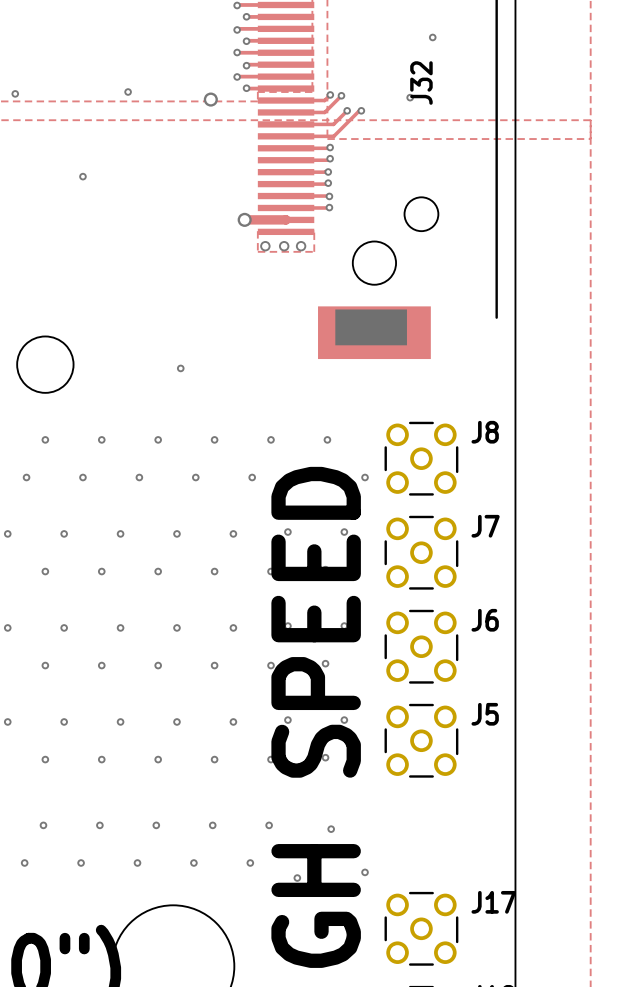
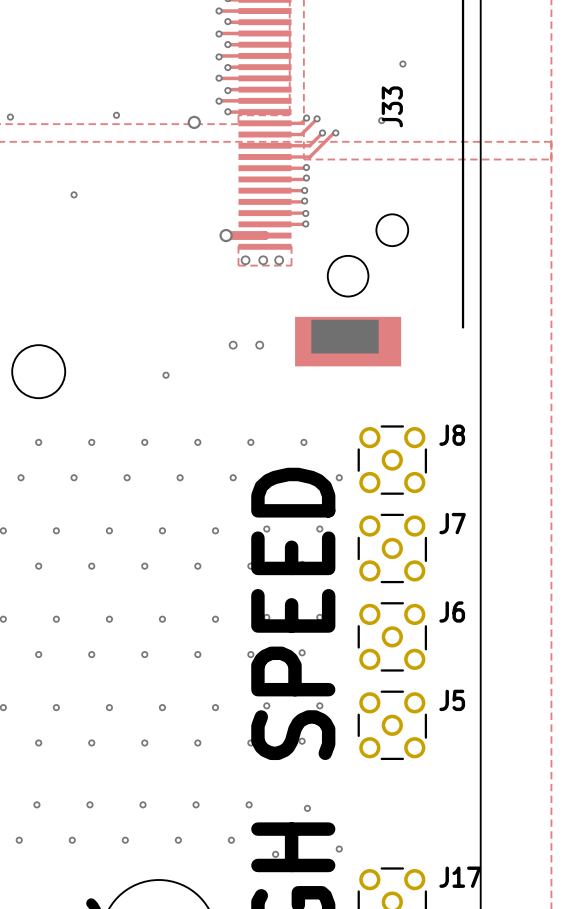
J32 name: J32 (421, 83) -> J33 (392, 106)
via: none -> (233, 345)
via: none -> (259, 345)

